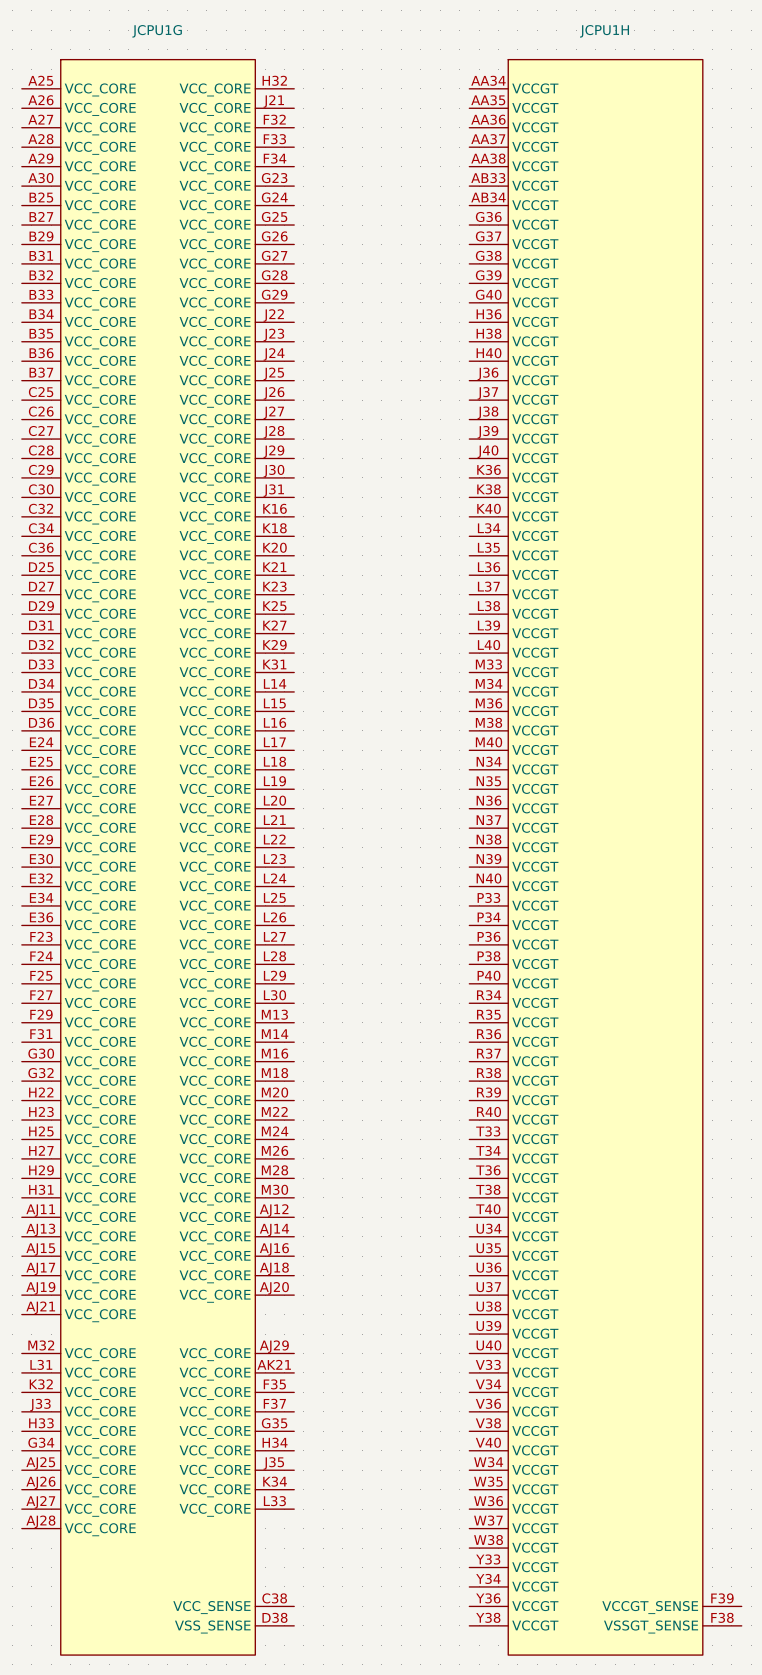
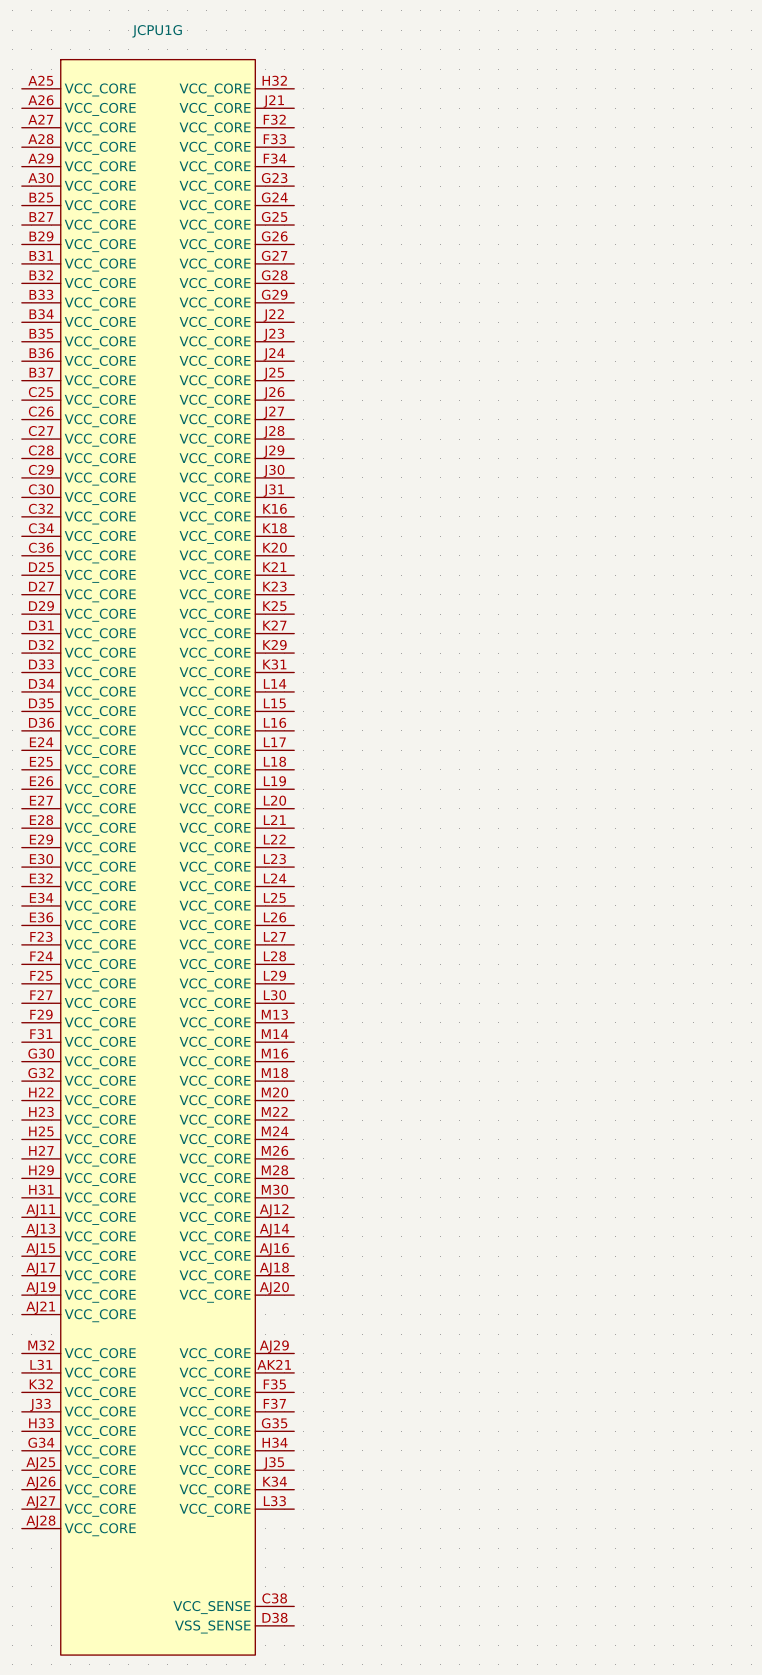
JCPU1H: (605, 857) -> none

